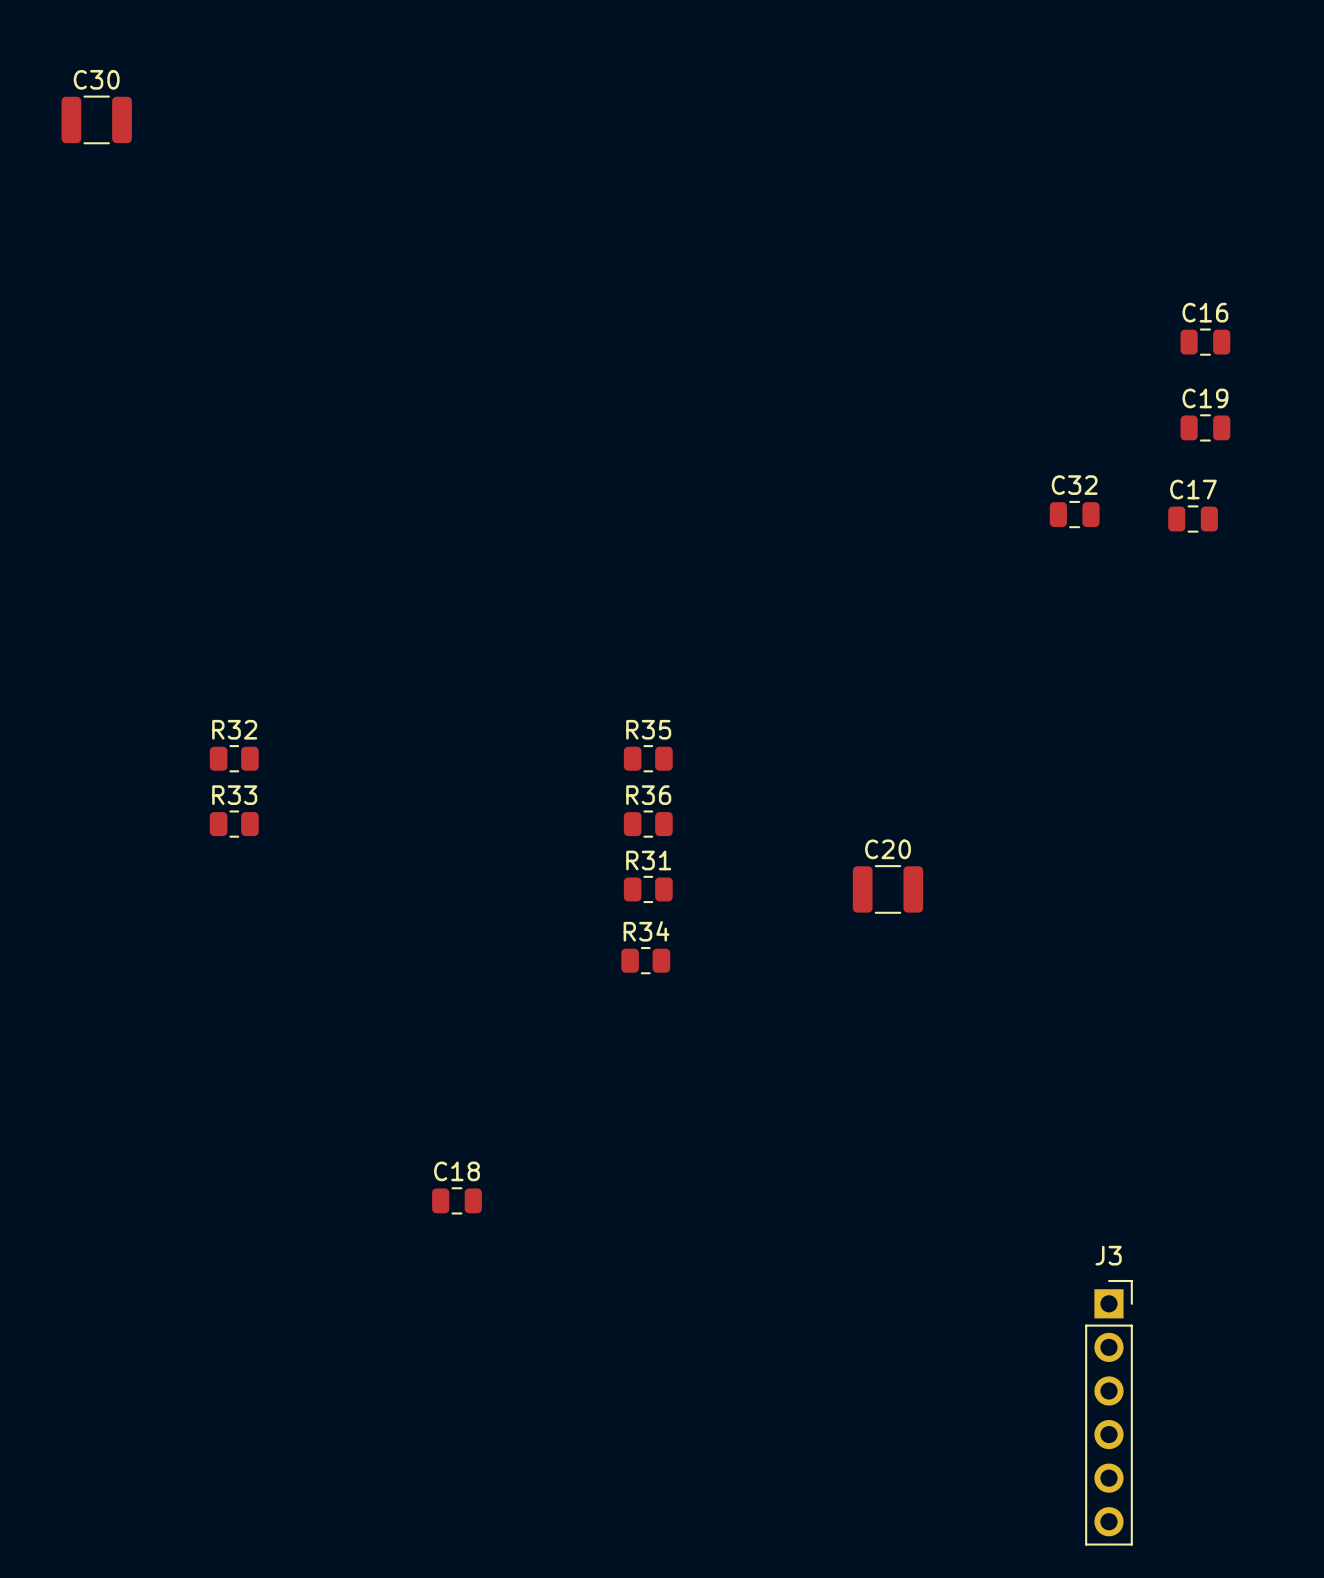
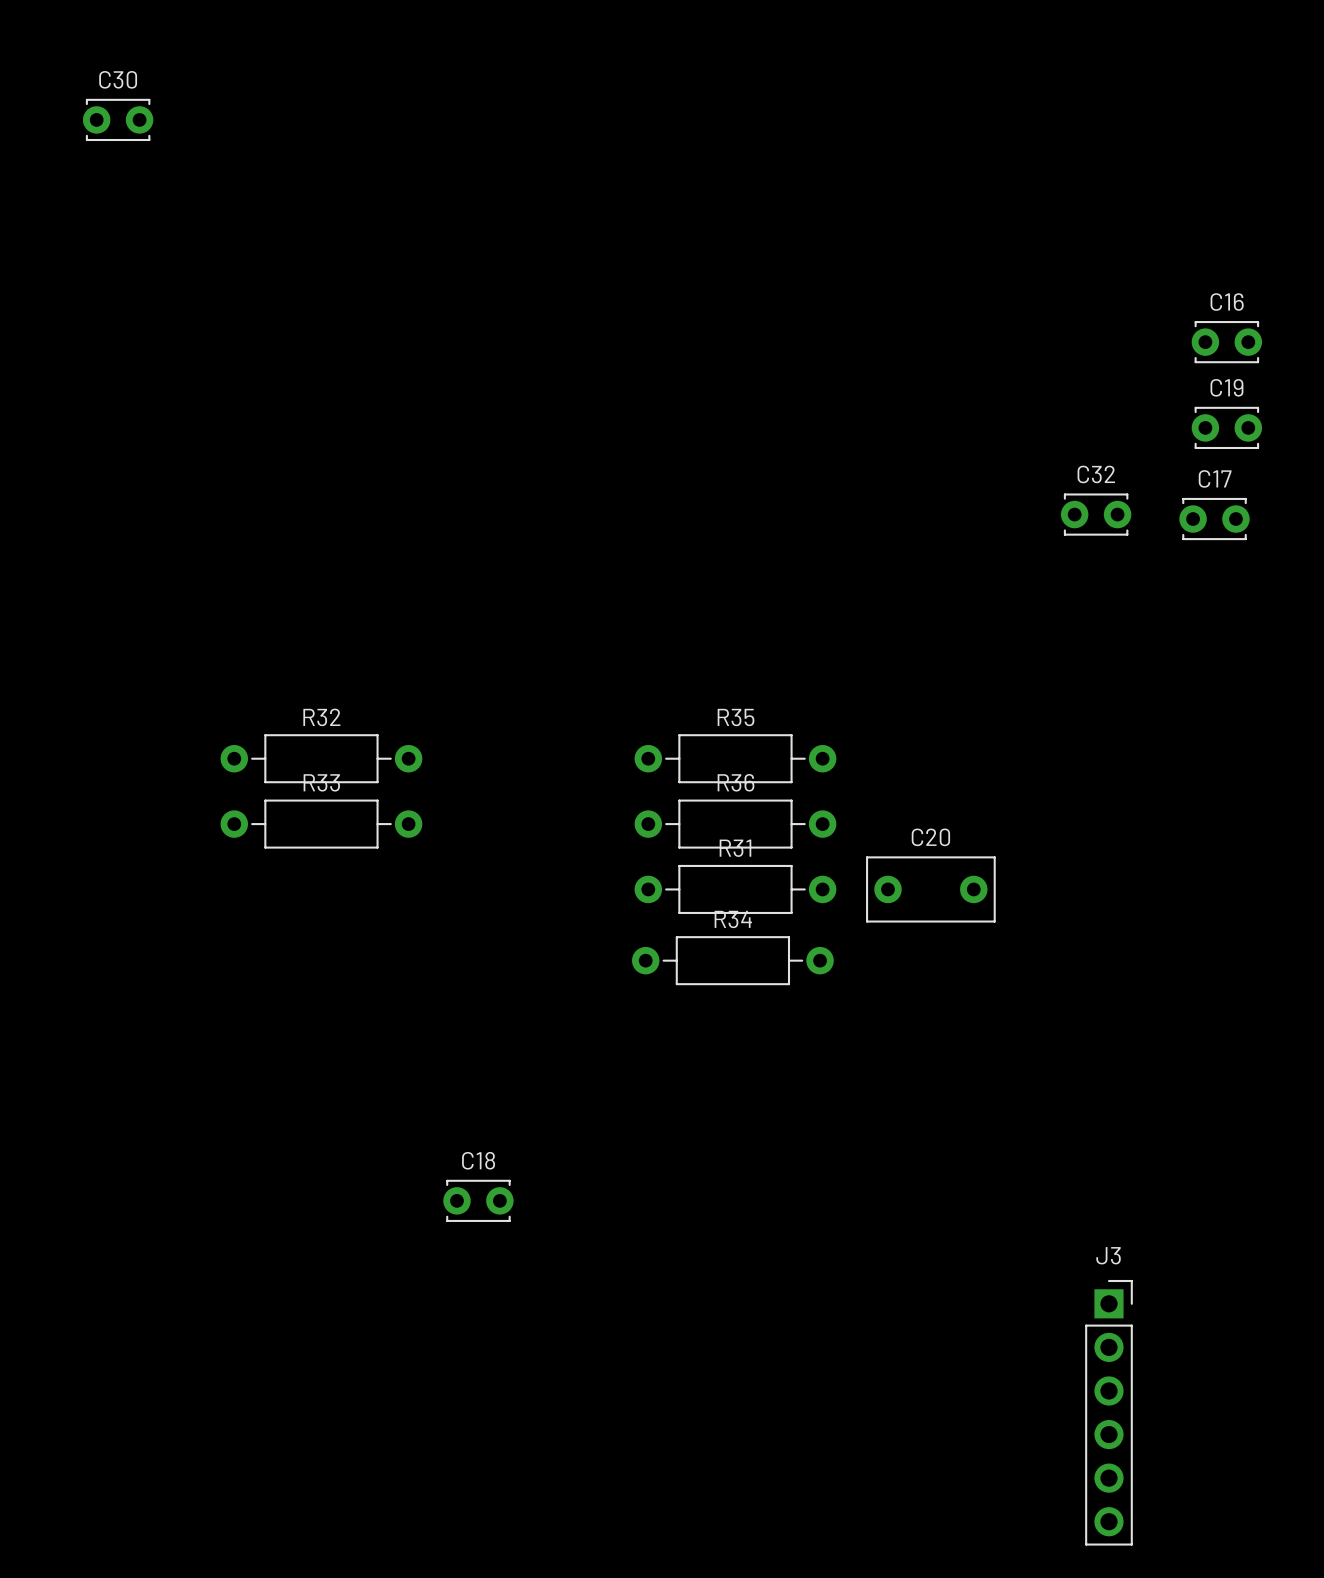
C30 footprint: [61, 95, 132, 145] -> [82, 98, 154, 142]
C16 footprint: [1180, 328, 1231, 356] -> [1191, 321, 1263, 364]
C19 footprint: [1180, 414, 1231, 442] -> [1191, 406, 1263, 450]
C32 footprint: [1049, 500, 1100, 529] -> [1060, 493, 1132, 536]
C17 footprint: [1168, 505, 1218, 533] -> [1179, 497, 1250, 541]
R32 footprint: [209, 745, 259, 773] -> [220, 734, 423, 784]
R35 footprint: [623, 745, 673, 773] -> [634, 734, 837, 784]
R33 footprint: [209, 810, 259, 838] -> [220, 799, 423, 849]
R36 footprint: [623, 810, 673, 838] -> [634, 799, 837, 849]
C20 footprint: [852, 865, 924, 914] -> [866, 856, 996, 923]
R31 footprint: [623, 875, 673, 904] -> [634, 864, 837, 914]
R34 footprint: [621, 947, 671, 975] -> [632, 936, 834, 986]
C18 footprint: [432, 1187, 482, 1215] -> [443, 1179, 514, 1222]

